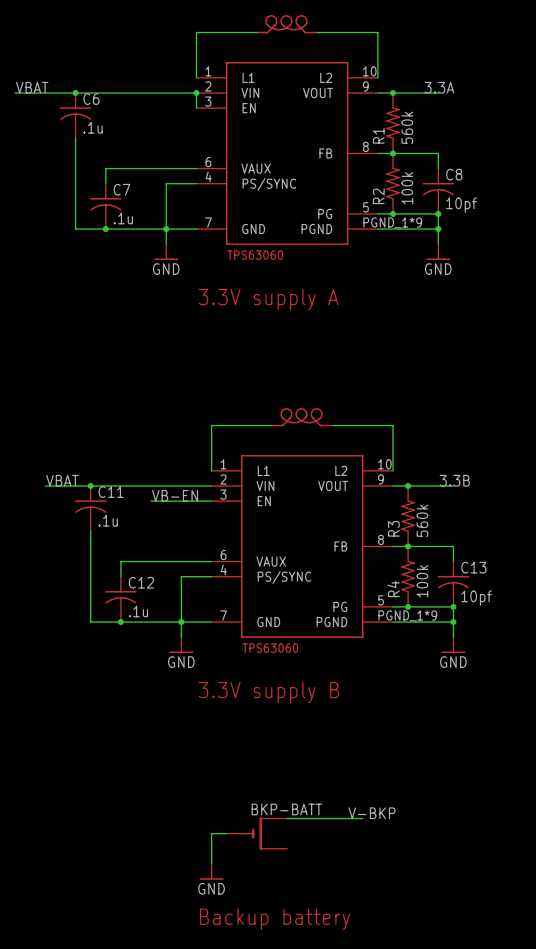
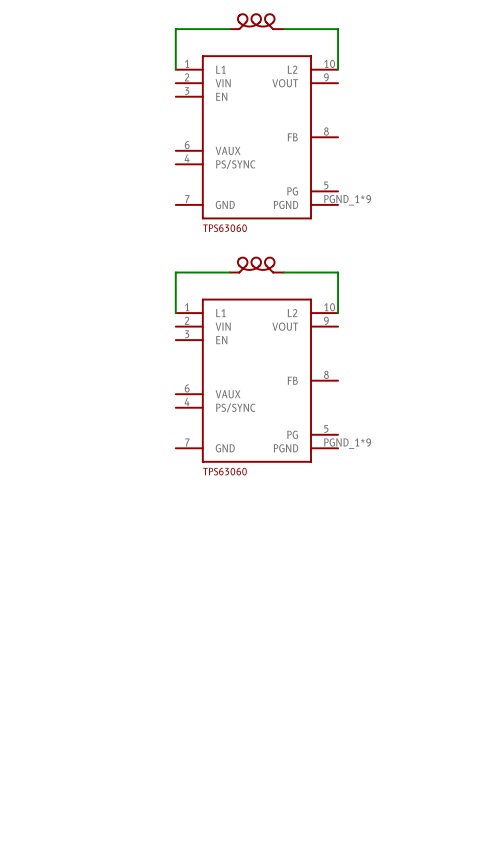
label: VBAT (32, 87) -> none
label: 3.3A (439, 87) -> none
wire: (15, 93) (196, 93) (196, 108) -> none
junction: (75, 93) -> none
junction: (196, 93) -> none
wire: (377, 93) (438, 93) -> none
junction: (392, 93) -> none
C6: .1u (75, 115) -> none
R1: 560k (392, 123) -> none
wire: (75, 138) (75, 229) (196, 229) -> none
wire: (377, 153) (438, 153) (438, 168) -> none
junction: (392, 153) -> none
wire: (196, 168) (105, 168) (105, 183) -> none
wire: (196, 183) (166, 183) (166, 244) -> none
R2: 100k (392, 183) -> none
C8: 10pf (438, 191) -> none
C7: .1u (105, 206) -> none
wire: (377, 213) (438, 213) (438, 244) -> none
junction: (392, 213) -> none
junction: (438, 213) -> none
junction: (105, 229) -> none
junction: (166, 229) -> none
wire: (377, 229) (438, 229) -> none
junction: (438, 229) -> none
power symbol: GND (166, 252) -> none
power symbol: GND (438, 252) -> none
text: 3.3V supply A (268, 299) -> none
part position: (302, 417) -> (256, 265)
wire: (272, 425) (211, 425) (211, 470) -> (229, 272) (175, 272) (175, 313)
wire: (332, 425) (392, 425) (392, 470) -> (283, 272) (338, 272) (338, 313)
label: VBAT (62, 480) -> none
label: 3.3B (454, 480) -> none
wire: (45, 486) (211, 486) -> none
junction: (90, 486) -> none
wire: (392, 486) (453, 486) -> none
junction: (408, 486) -> none
label: VB-EN (175, 495) -> none
wire: (151, 501) (211, 501) -> none
C11: .1u (90, 508) -> none
R3: 560k (408, 516) -> none
wire: (90, 531) (90, 622) (211, 622) -> none
part position: (302, 546) -> (256, 380)
wire: (392, 546) (453, 546) (453, 561) -> none
junction: (408, 546) -> none
wire: (211, 561) (120, 561) (120, 576) -> none
wire: (211, 576) (181, 576) (181, 637) -> none
R4: 100k (408, 576) -> none
C13: 10pf (453, 584) -> none
C12: .1u (120, 599) -> none
wire: (392, 606) (453, 606) (453, 637) -> none
junction: (408, 606) -> none
junction: (453, 606) -> none
junction: (120, 622) -> none
junction: (181, 622) -> none
wire: (392, 622) (453, 622) -> none
junction: (453, 622) -> none
power symbol: GND (181, 645) -> none
power symbol: GND (453, 645) -> none
text: 3.3V supply B (268, 692) -> none
label: V-BKP (372, 813) -> none
wire: (287, 818) (362, 818) -> none
wire: (226, 833) (211, 833) (211, 863) -> none
BKP-BATT: (256, 833) -> none
power symbol: GND (211, 871) -> none
text: Backup battery (275, 919) -> none

